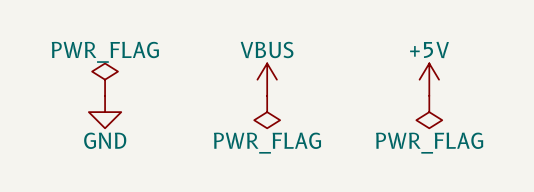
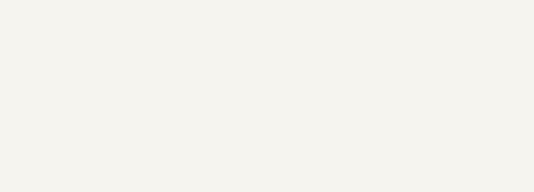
power symbol: PWR_FLAG (105, 79) -> none
power symbol: VBUS (267, 79) -> none
power symbol: +5V (429, 79) -> none
power symbol: GND (105, 112) -> none
power symbol: PWR_FLAG (267, 112) -> none
power symbol: PWR_FLAG (429, 112) -> none

